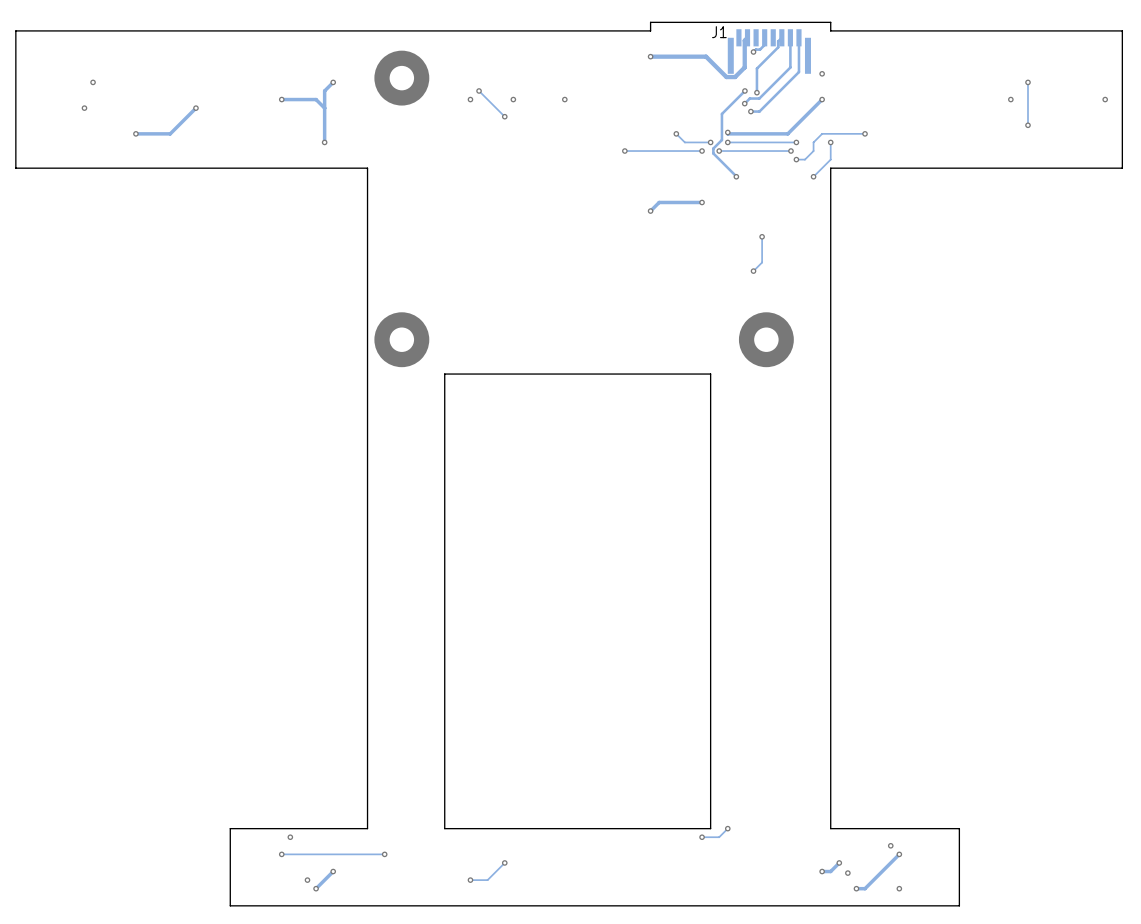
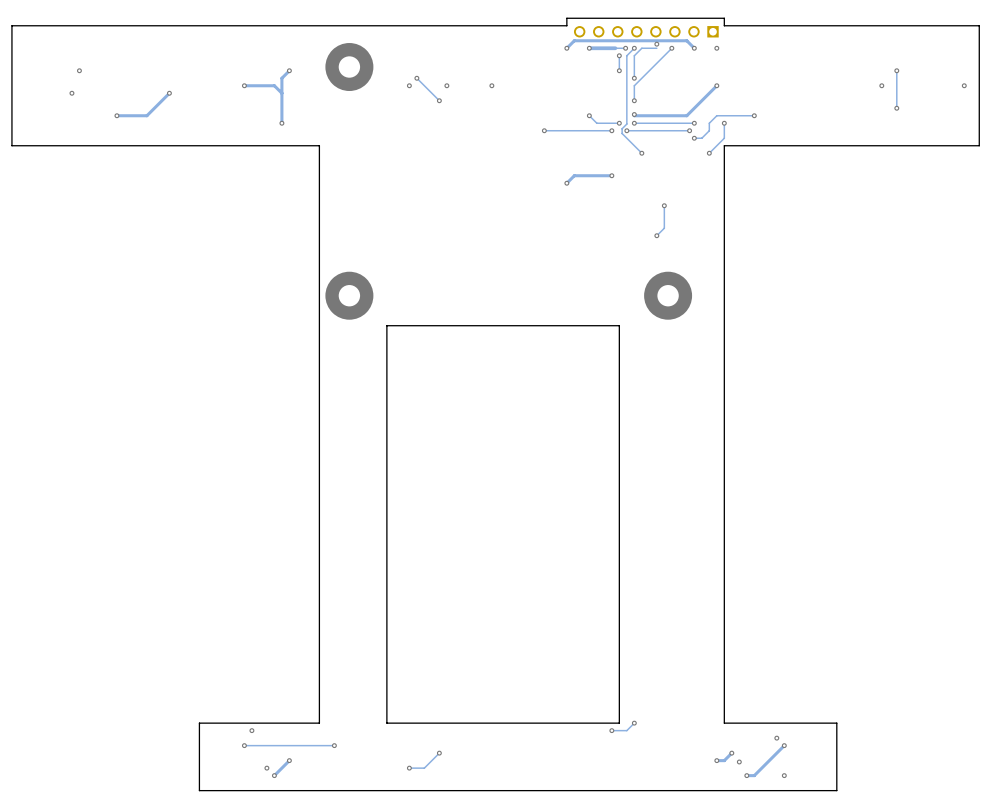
part: none -> (646, 31)
track: (747, 37) (744, 40) (744, 67) (735, 77) (726, 77) (706, 56) -> (625, 48) (615, 48)
track: (764, 37) (764, 44) (753, 52) -> none
track: (781, 37) (778, 41) (778, 47) (756, 68) (756, 92) -> none
track: (790, 37) (790, 67) (759, 98) (749, 98) (744, 103) -> none
track: (798, 37) (798, 72) (759, 111) (750, 111) -> none
J1: (769, 51) -> none
track: (676, 56) (650, 56) -> (694, 48) (686, 40) (574, 40) (566, 48)
via: none -> (589, 48)
via: none -> (625, 48)
via: none -> (634, 48)
track: none -> (656, 48) (641, 48) (634, 55) (634, 78)
track: none -> (671, 48) (634, 85) (634, 100)
via: none -> (671, 48)
via: none -> (694, 48)
via: none -> (716, 48)
track: none -> (619, 55) (619, 70)
via: none -> (619, 55)
via: (822, 73) -> none
via: none -> (619, 70)
via: none -> (634, 78)
track: (744, 90) (721, 113) (721, 140) (713, 148) (713, 153) (736, 176) -> (634, 48) (626, 55) (626, 124) (622, 128) (622, 133) (641, 153)
via: (744, 90) -> none
via: (756, 92) -> none
via: (744, 103) -> none
via: (750, 111) -> none
via: none -> (634, 100)

